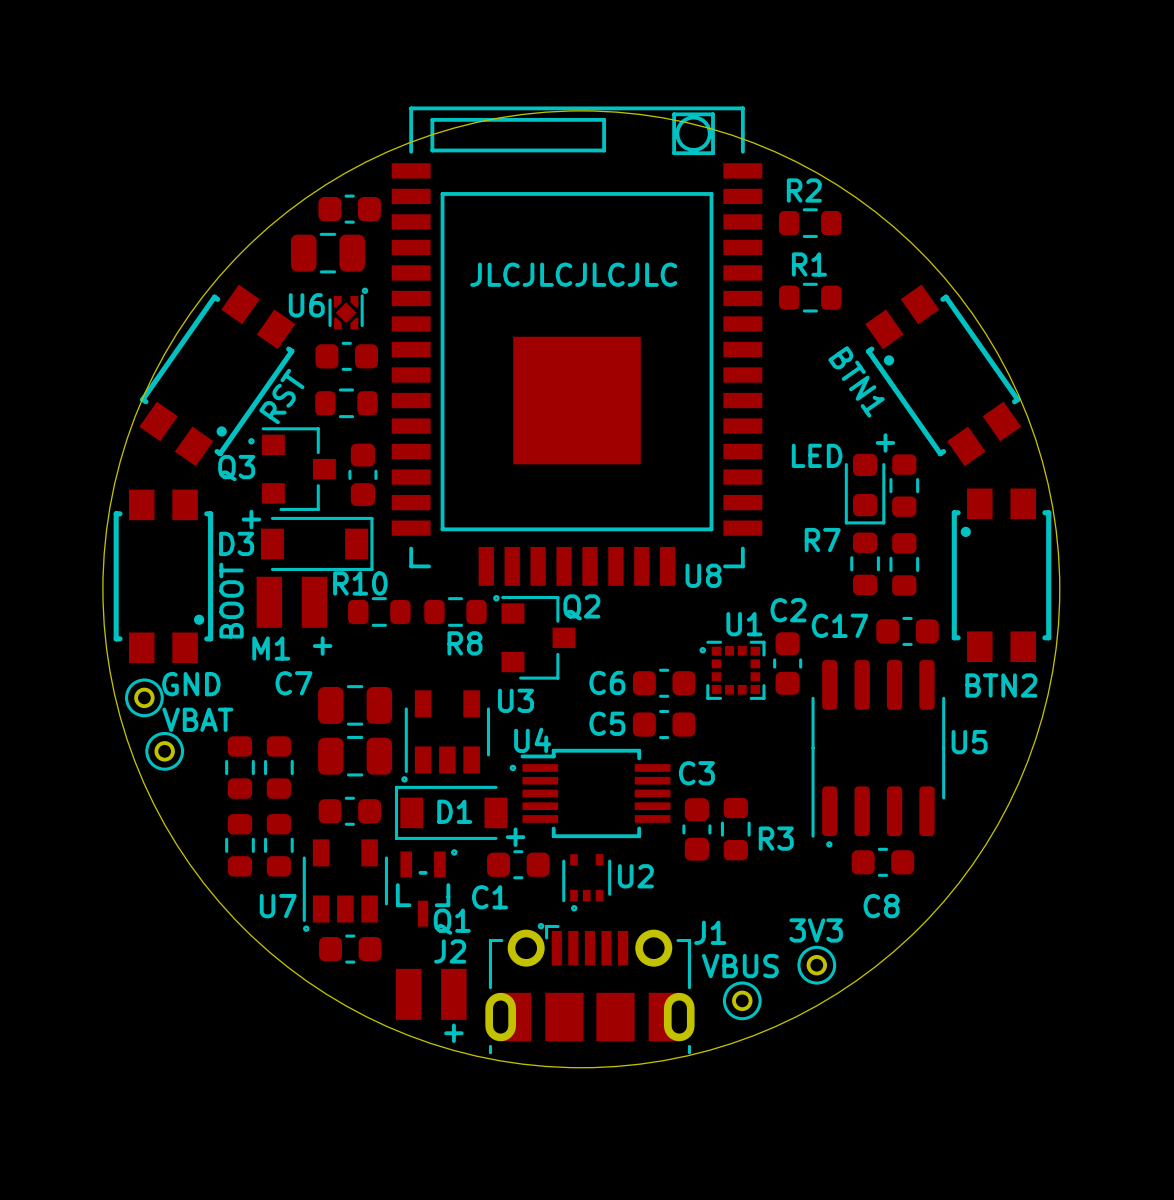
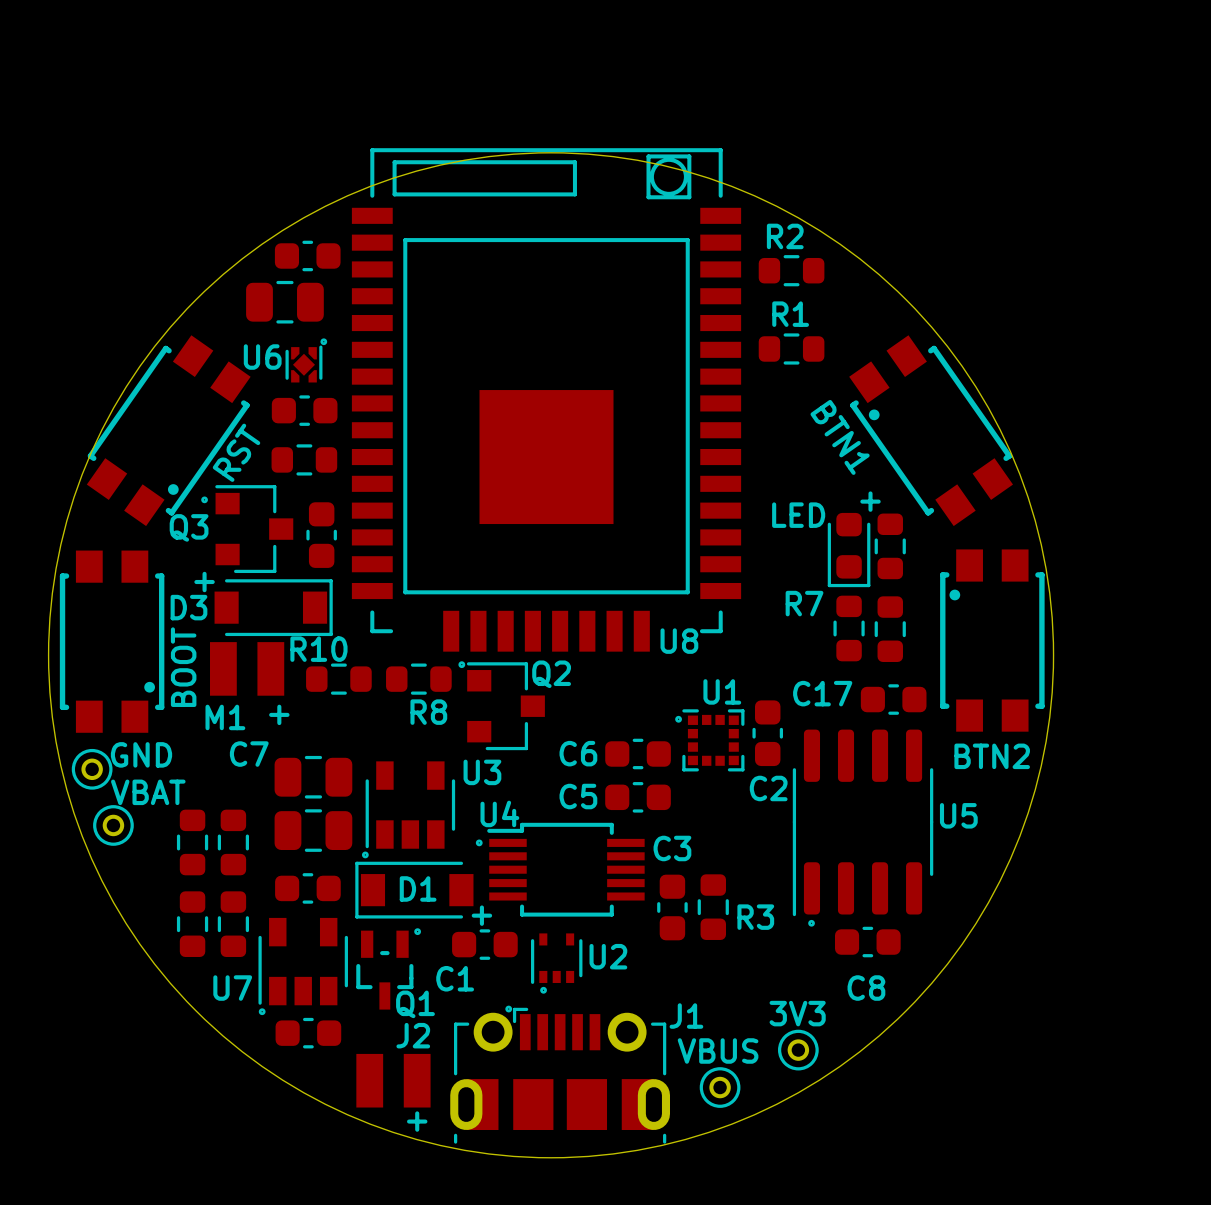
text: JLCJLCJLCJLC (573, 274) -> none
C2 name position: C2 (788, 610) -> C2 (768, 788)

